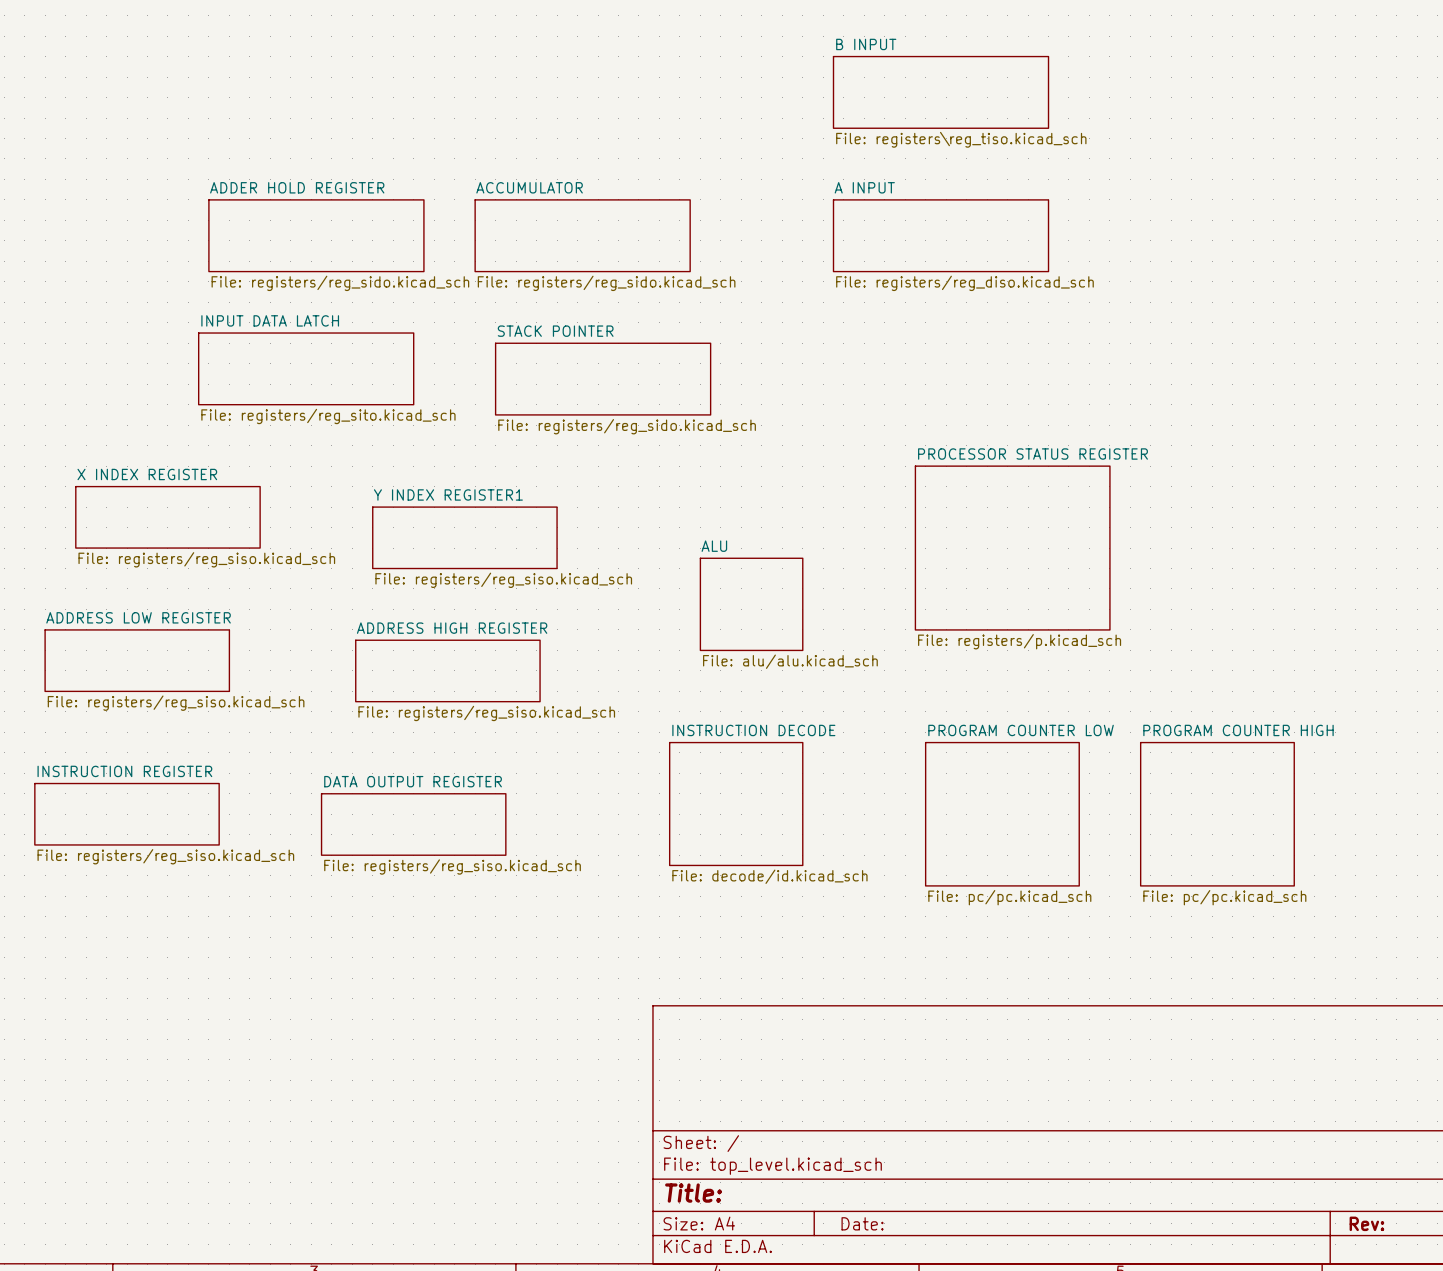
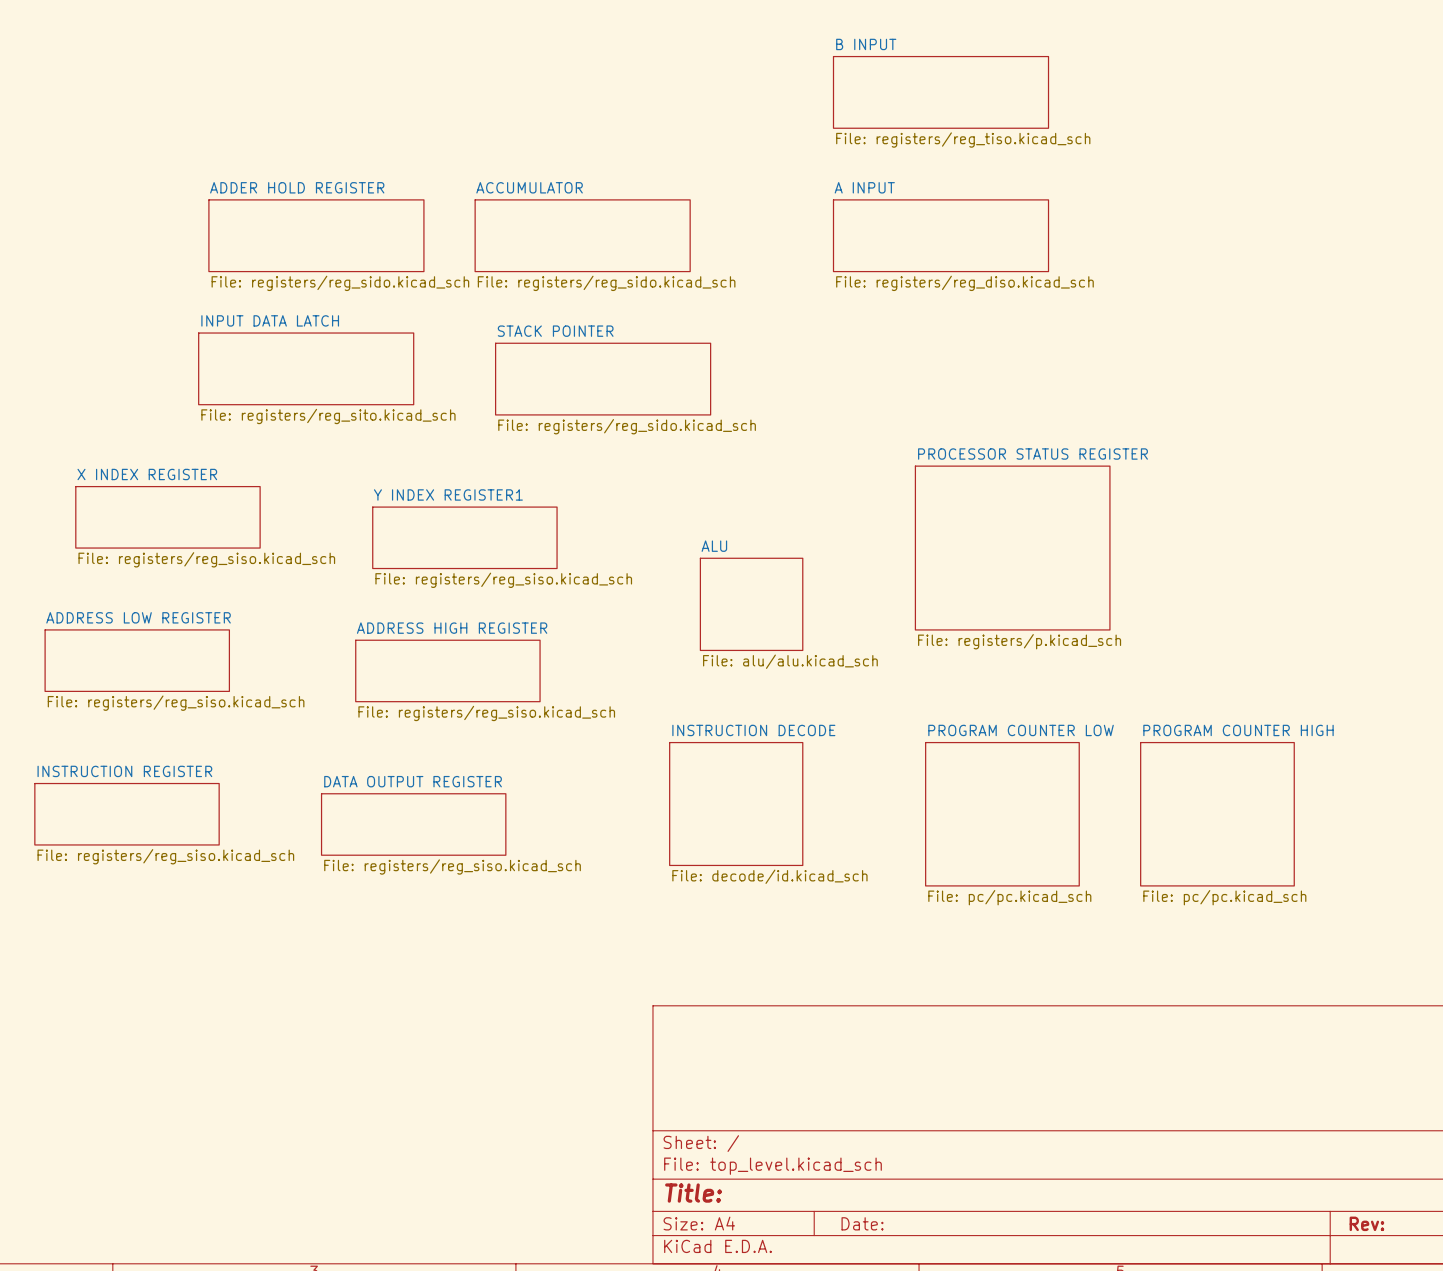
sheet B INPUT value: File: registers\reg_tiso.kicad_sch (961, 139) -> File: registers/reg_tiso.kicad_sch (963, 140)

